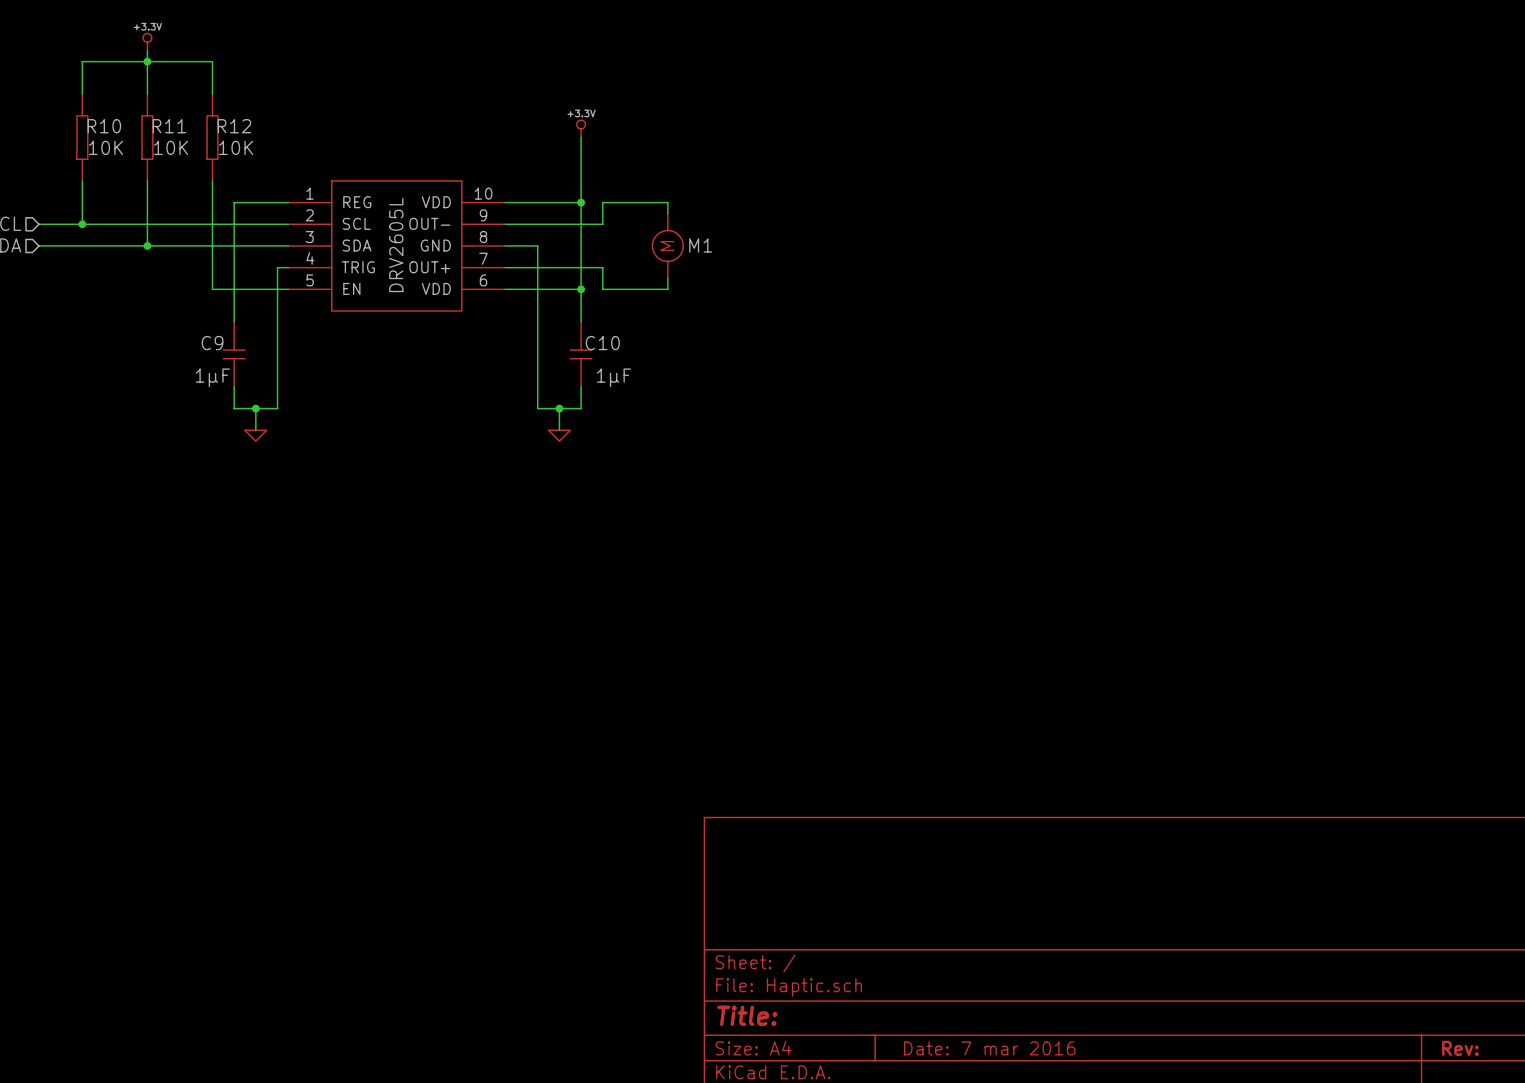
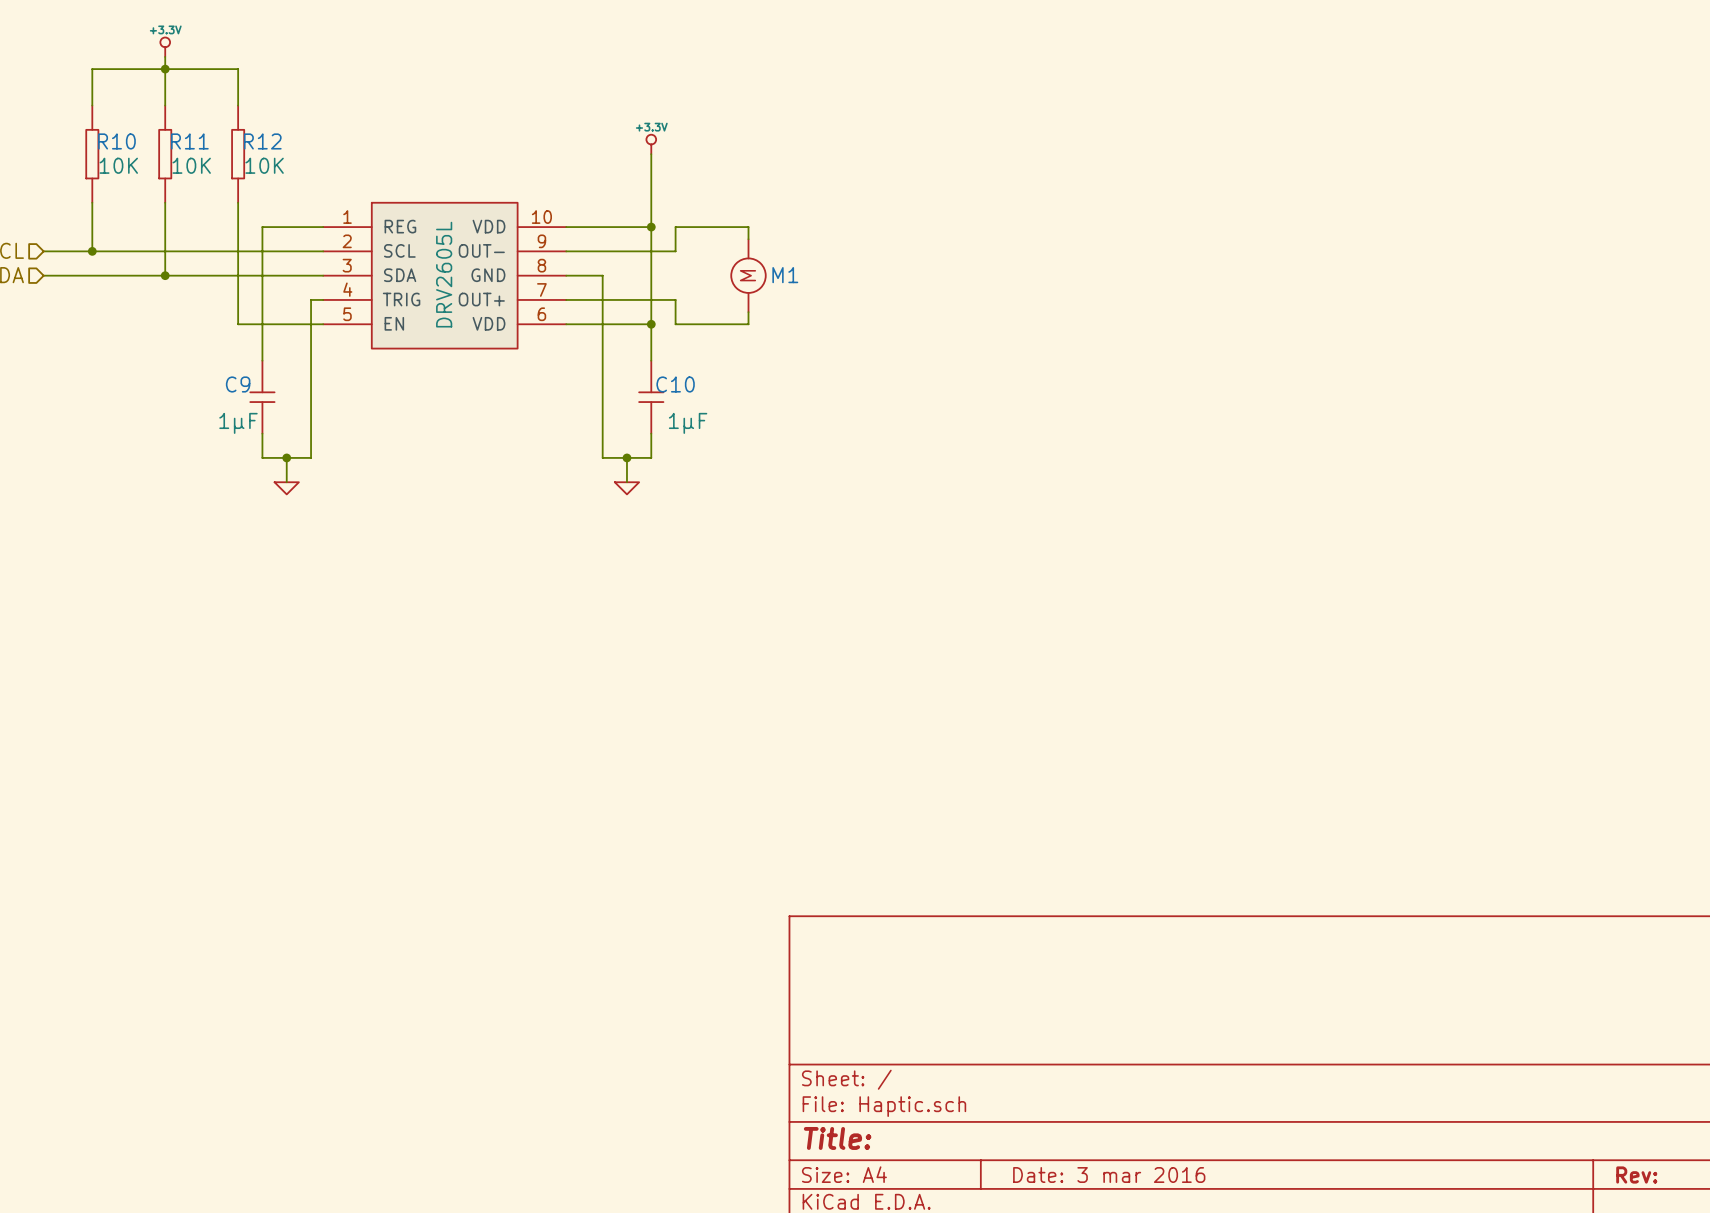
title block: Date: 7 mar 2016 (989, 1048) -> Date: 3 mar 2016 (1109, 1175)

